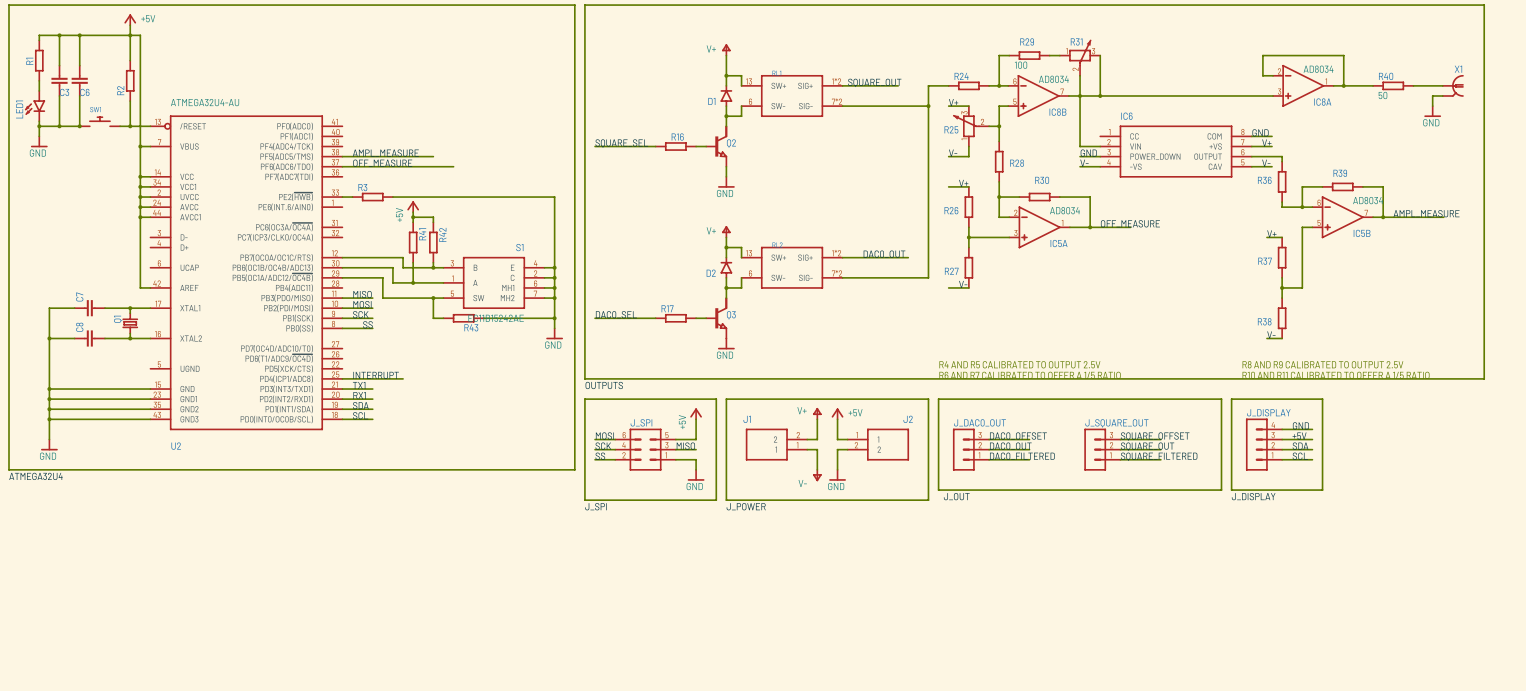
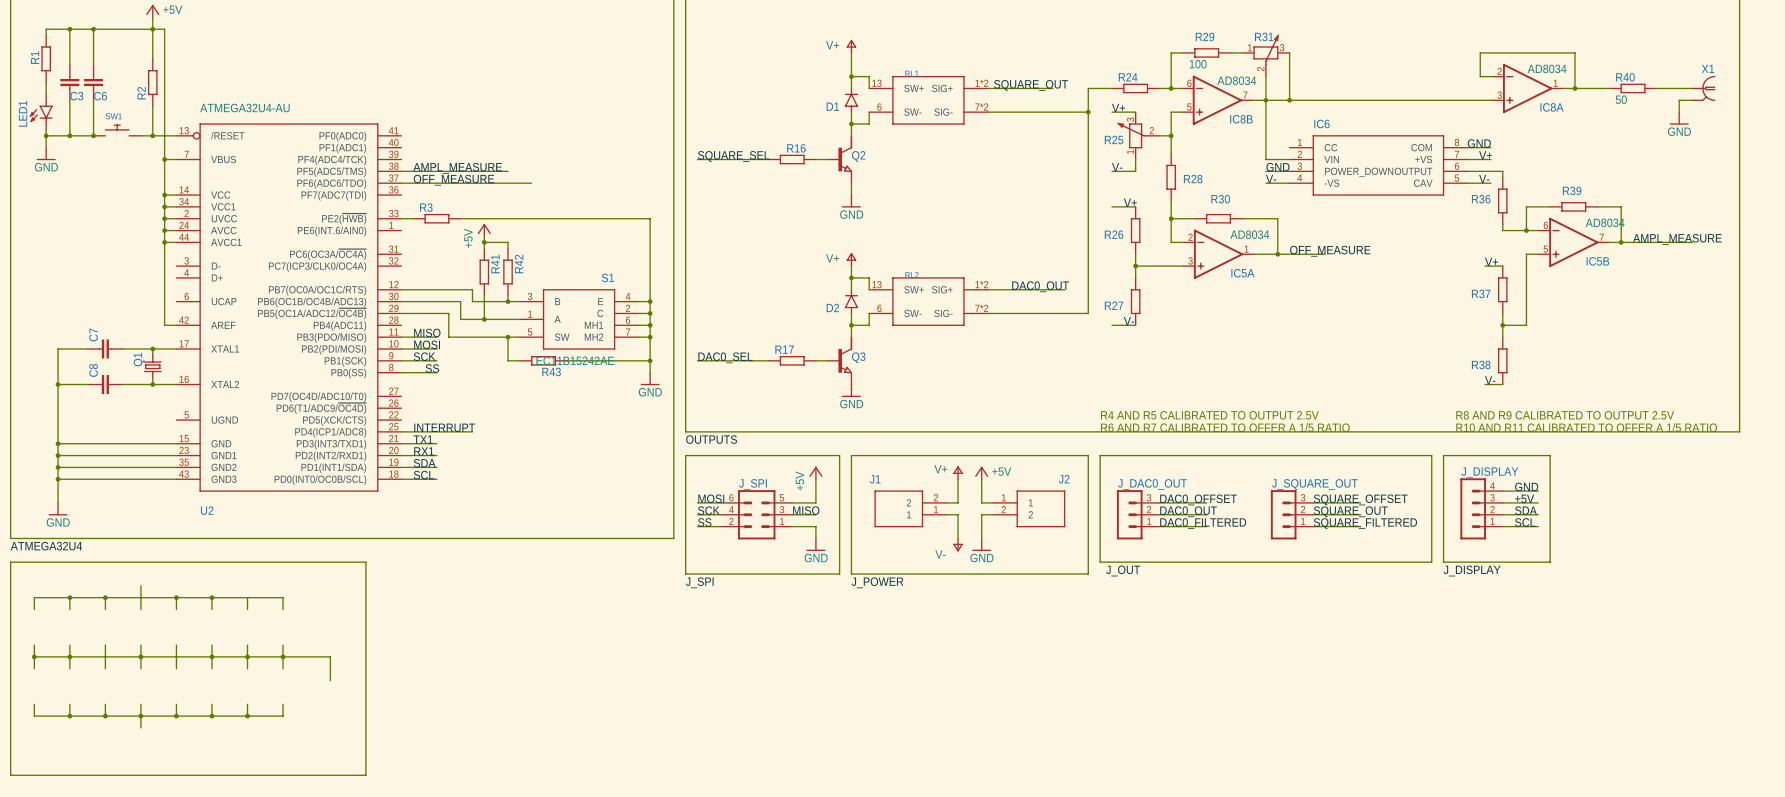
wire: none -> (10, 562) (10, 775) (365, 775) (365, 562) (10, 562)
wire: none -> (140, 585) (140, 609)
wire: none -> (69, 597) (69, 609)
junction: none -> (69, 597)
wire: none -> (105, 597) (105, 609)
junction: none -> (105, 597)
wire: none -> (176, 597) (176, 609)
junction: none -> (176, 597)
wire: none -> (211, 597) (211, 609)
junction: none -> (211, 597)
wire: none -> (247, 597) (247, 609)
wire: none -> (34, 609) (34, 597) (283, 597) (283, 609)
wire: none -> (34, 645) (34, 668)
wire: none -> (69, 645) (69, 668)
wire: none -> (105, 645) (105, 668)
wire: none -> (140, 645) (140, 668)
wire: none -> (176, 645) (176, 668)
wire: none -> (211, 645) (211, 668)
wire: none -> (247, 645) (247, 668)
wire: none -> (283, 645) (283, 668)
wire: none -> (34, 656) (330, 656) (330, 680)
junction: none -> (34, 656)
junction: none -> (69, 656)
junction: none -> (140, 656)
junction: none -> (211, 656)
junction: none -> (247, 656)
junction: none -> (283, 656)
wire: none -> (34, 704) (34, 716) (283, 716) (283, 704)
wire: none -> (69, 704) (69, 716)
wire: none -> (105, 704) (105, 716)
wire: none -> (140, 704) (140, 727)
wire: none -> (176, 704) (176, 716)
wire: none -> (211, 704) (211, 716)
wire: none -> (247, 704) (247, 716)
junction: none -> (69, 716)
junction: none -> (105, 716)
junction: none -> (140, 716)
junction: none -> (176, 716)
junction: none -> (211, 716)
junction: none -> (247, 716)

